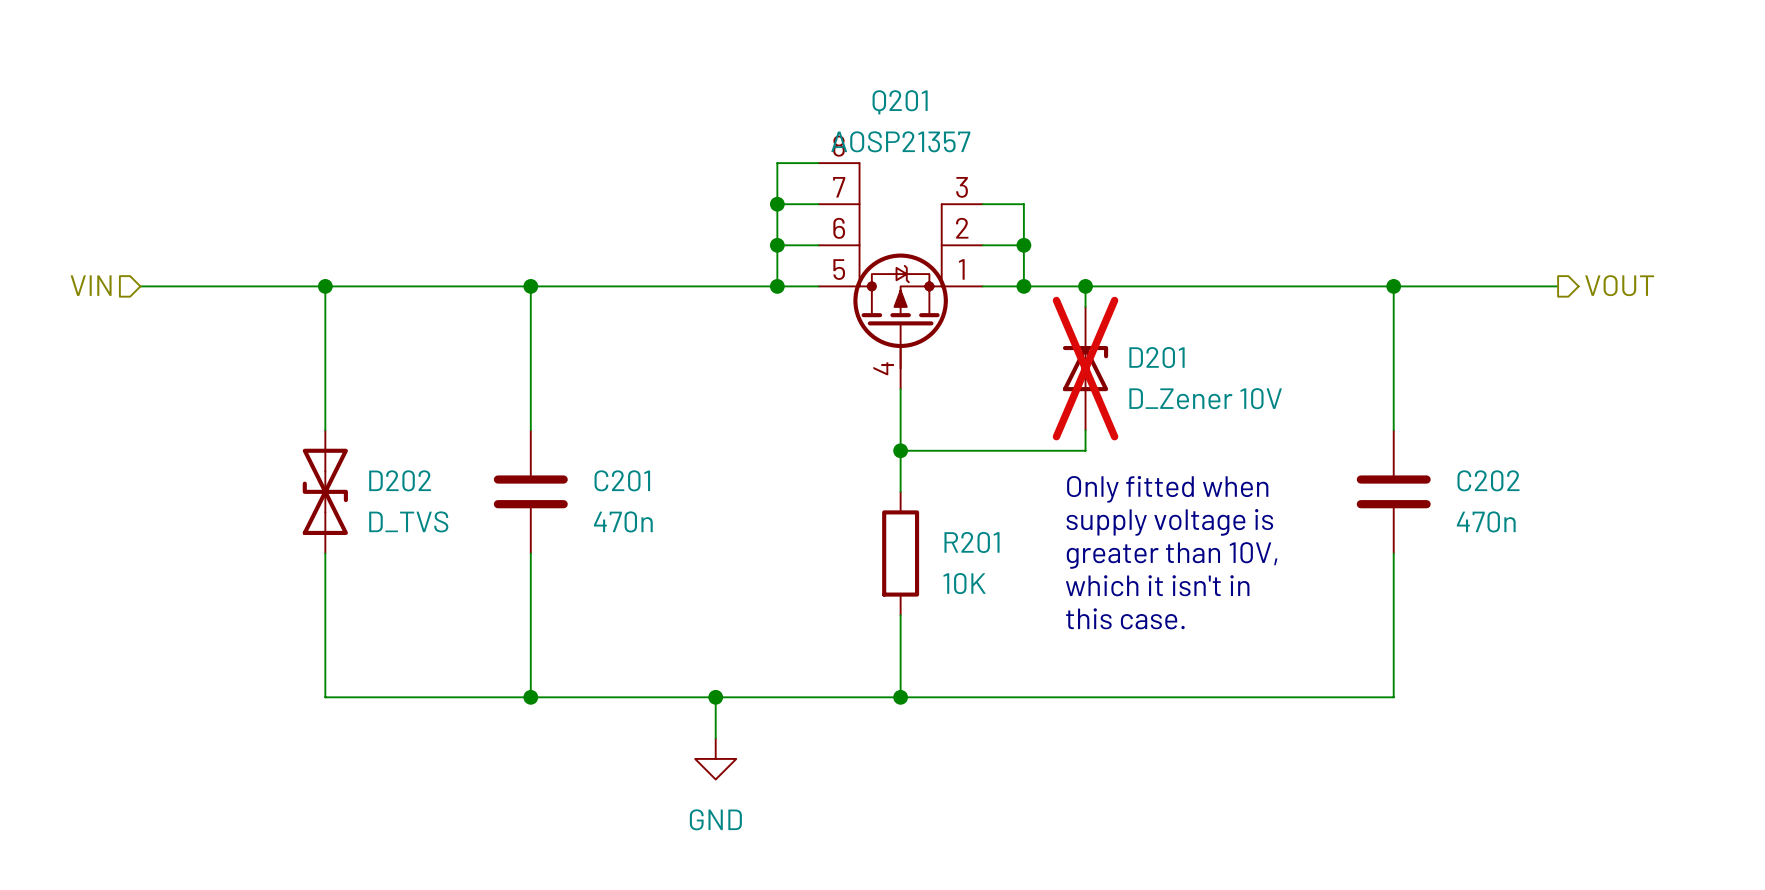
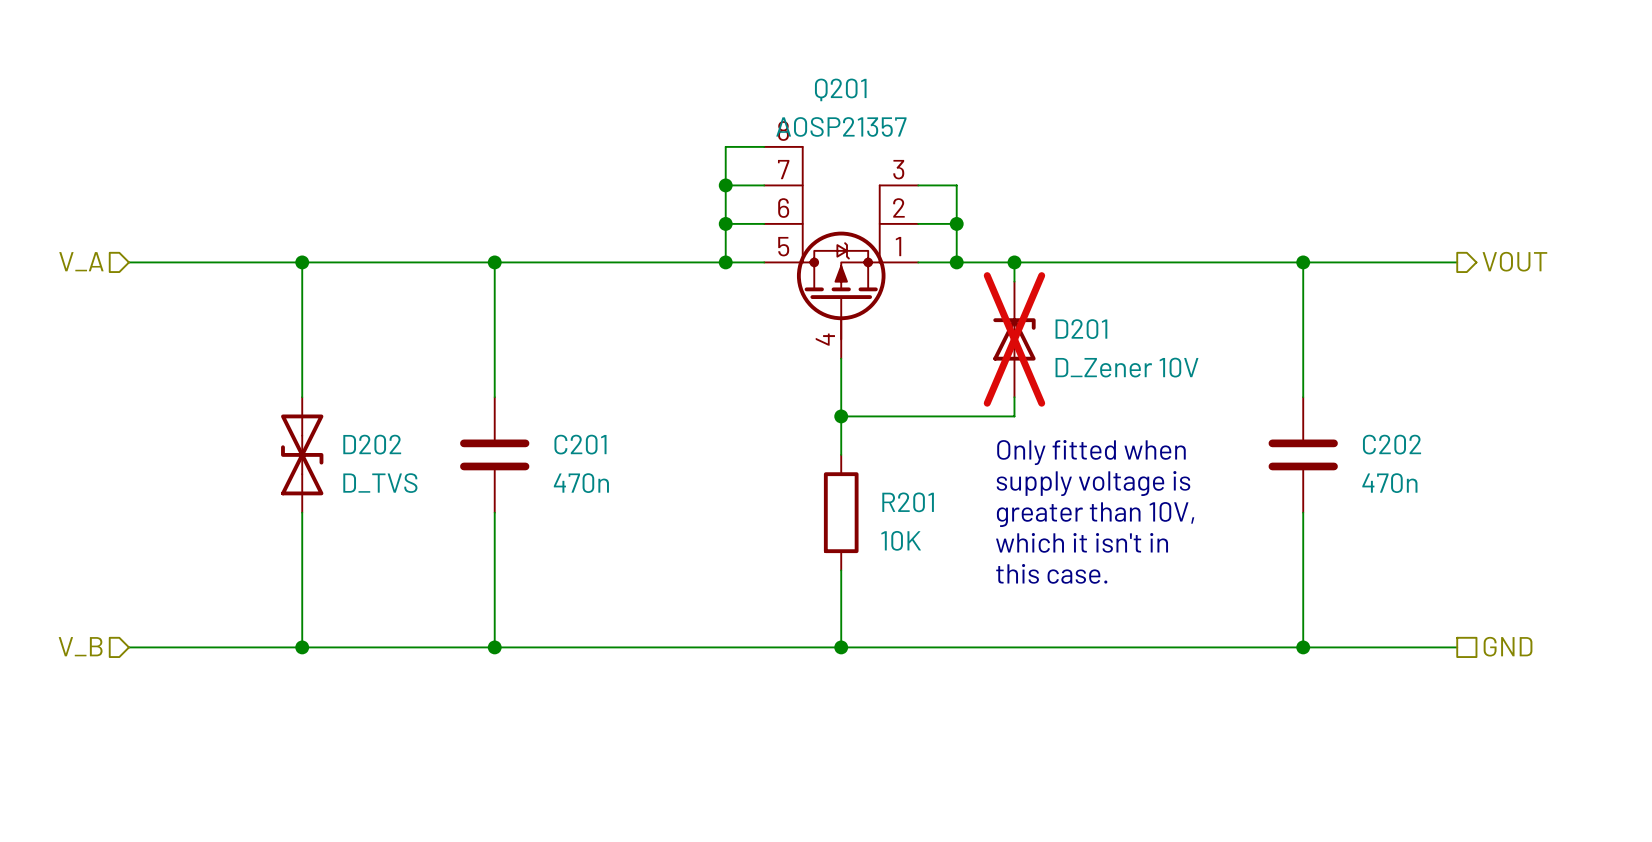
hierarchical label: VIN (91, 285) -> V_A (81, 261)
hierarchical label: none -> V_B (80, 646)
hierarchical label: none -> GND (1508, 646)
wire: none -> (128, 647) (302, 647)
junction: none -> (302, 647)
wire: (715, 697) (715, 738) -> none
junction: (715, 697) -> none
wire: none -> (1303, 647) (1457, 647)
junction: none -> (1303, 647)
power symbol: GND (715, 758) -> none

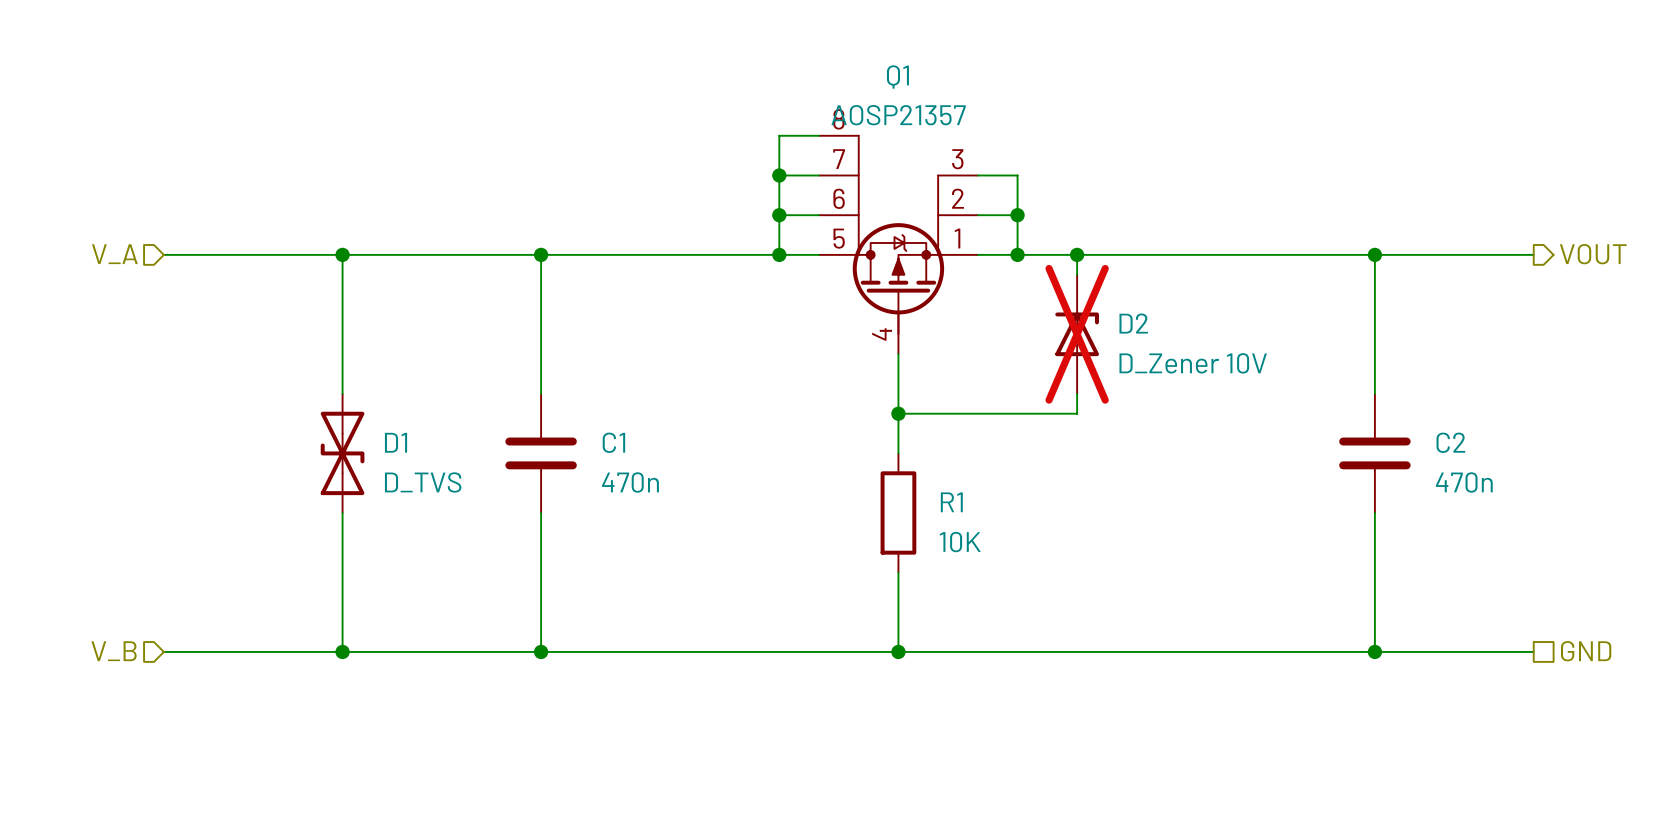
Q201 name: Q201 (840, 89) -> Q1 (897, 77)
D201 name: D201 (1081, 329) -> D2 (1133, 323)
D202 name: D202 (372, 444) -> D1 (396, 442)
C201 name: C201 (580, 444) -> C1 (613, 442)
C202 name: C202 (1392, 444) -> C2 (1450, 442)
text: Only fitted when (1091, 452) -> none
text: supply voltage is (1093, 483) -> none
R201 name: R201 (908, 502) -> R1 (951, 502)
text: greater than 10V, (1095, 514) -> none
text: which it isn't in (1082, 542) -> none
text: this case. (1051, 573) -> none

